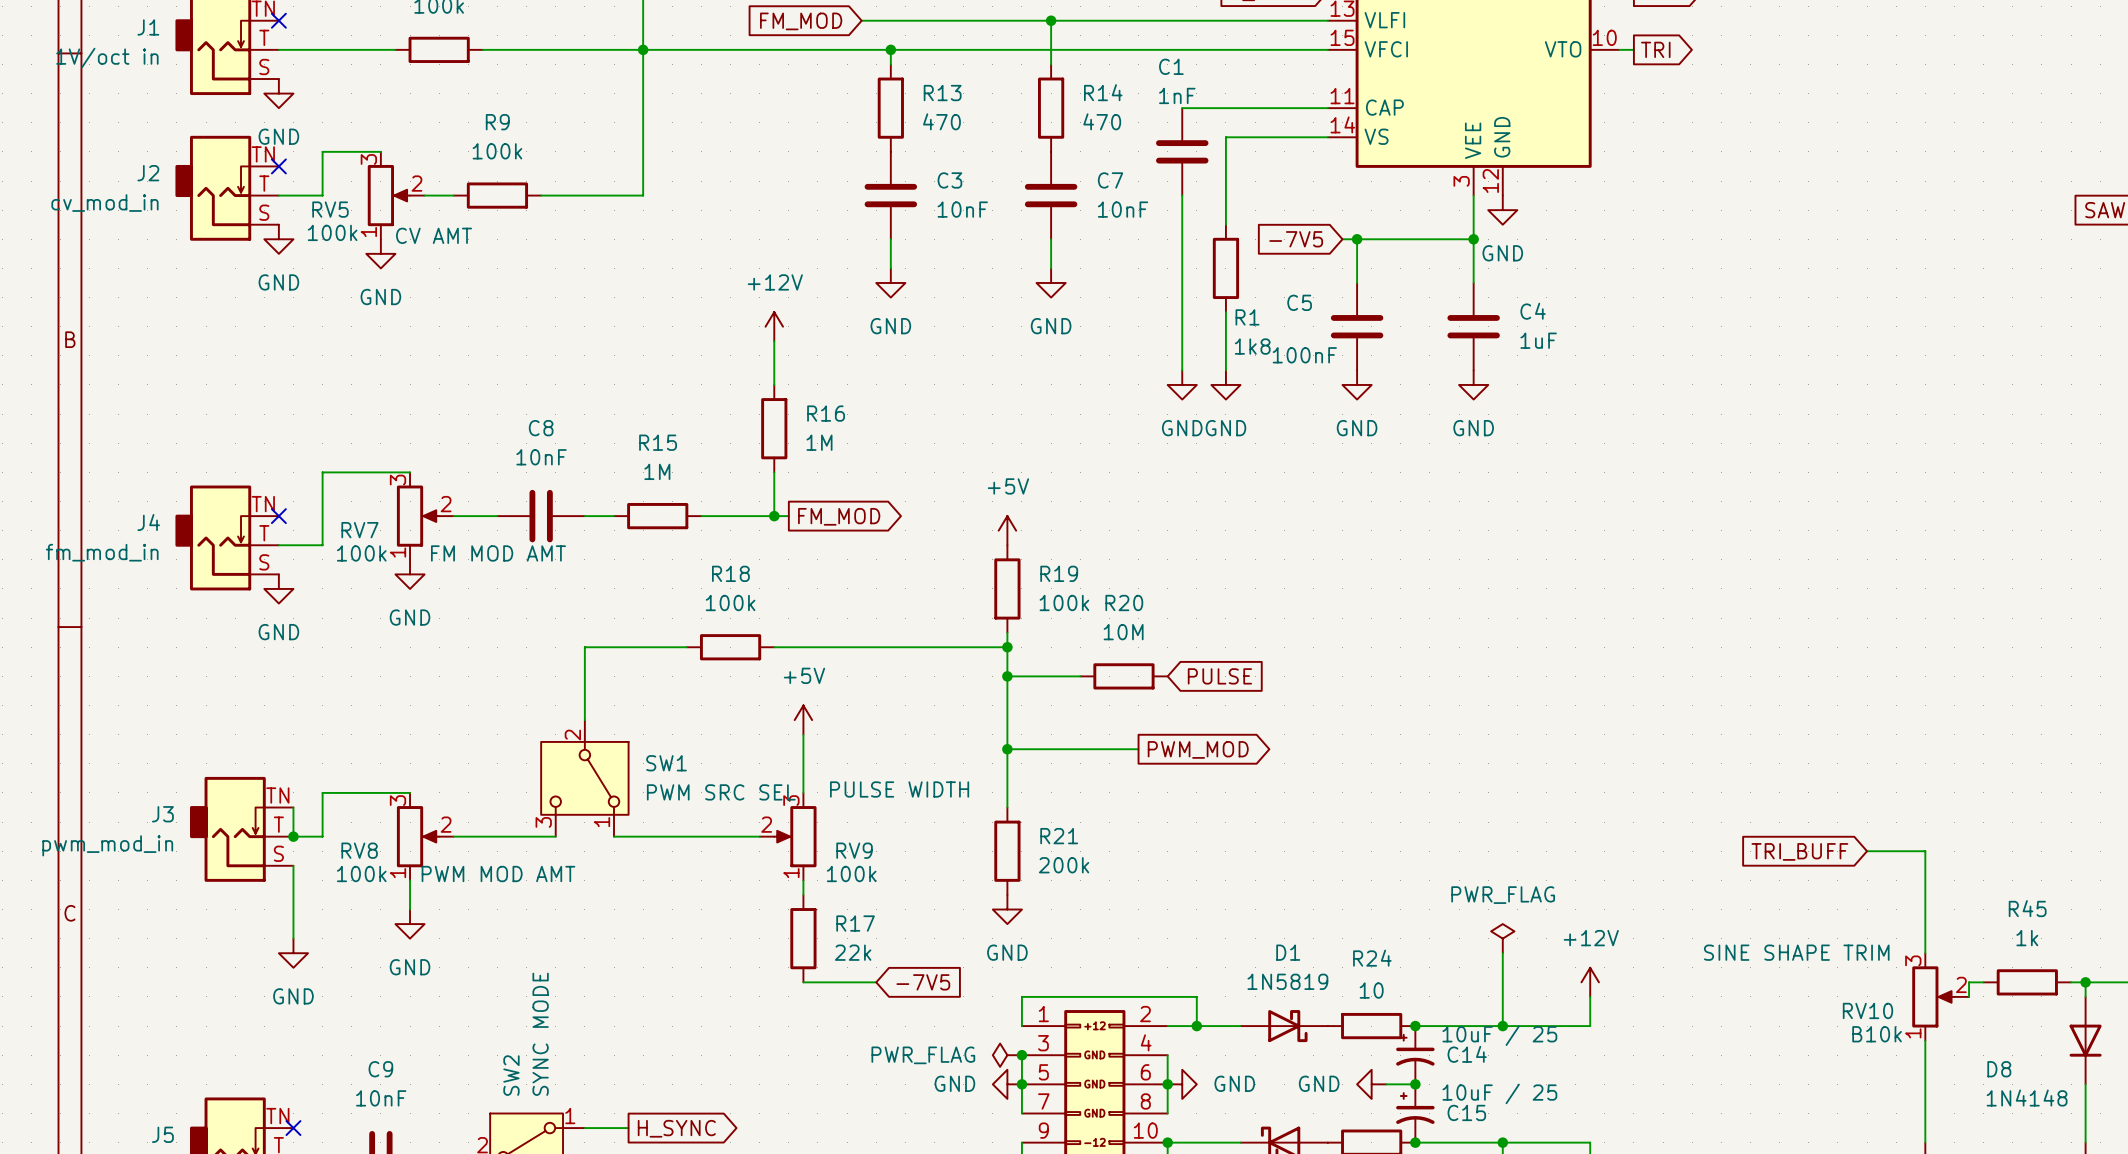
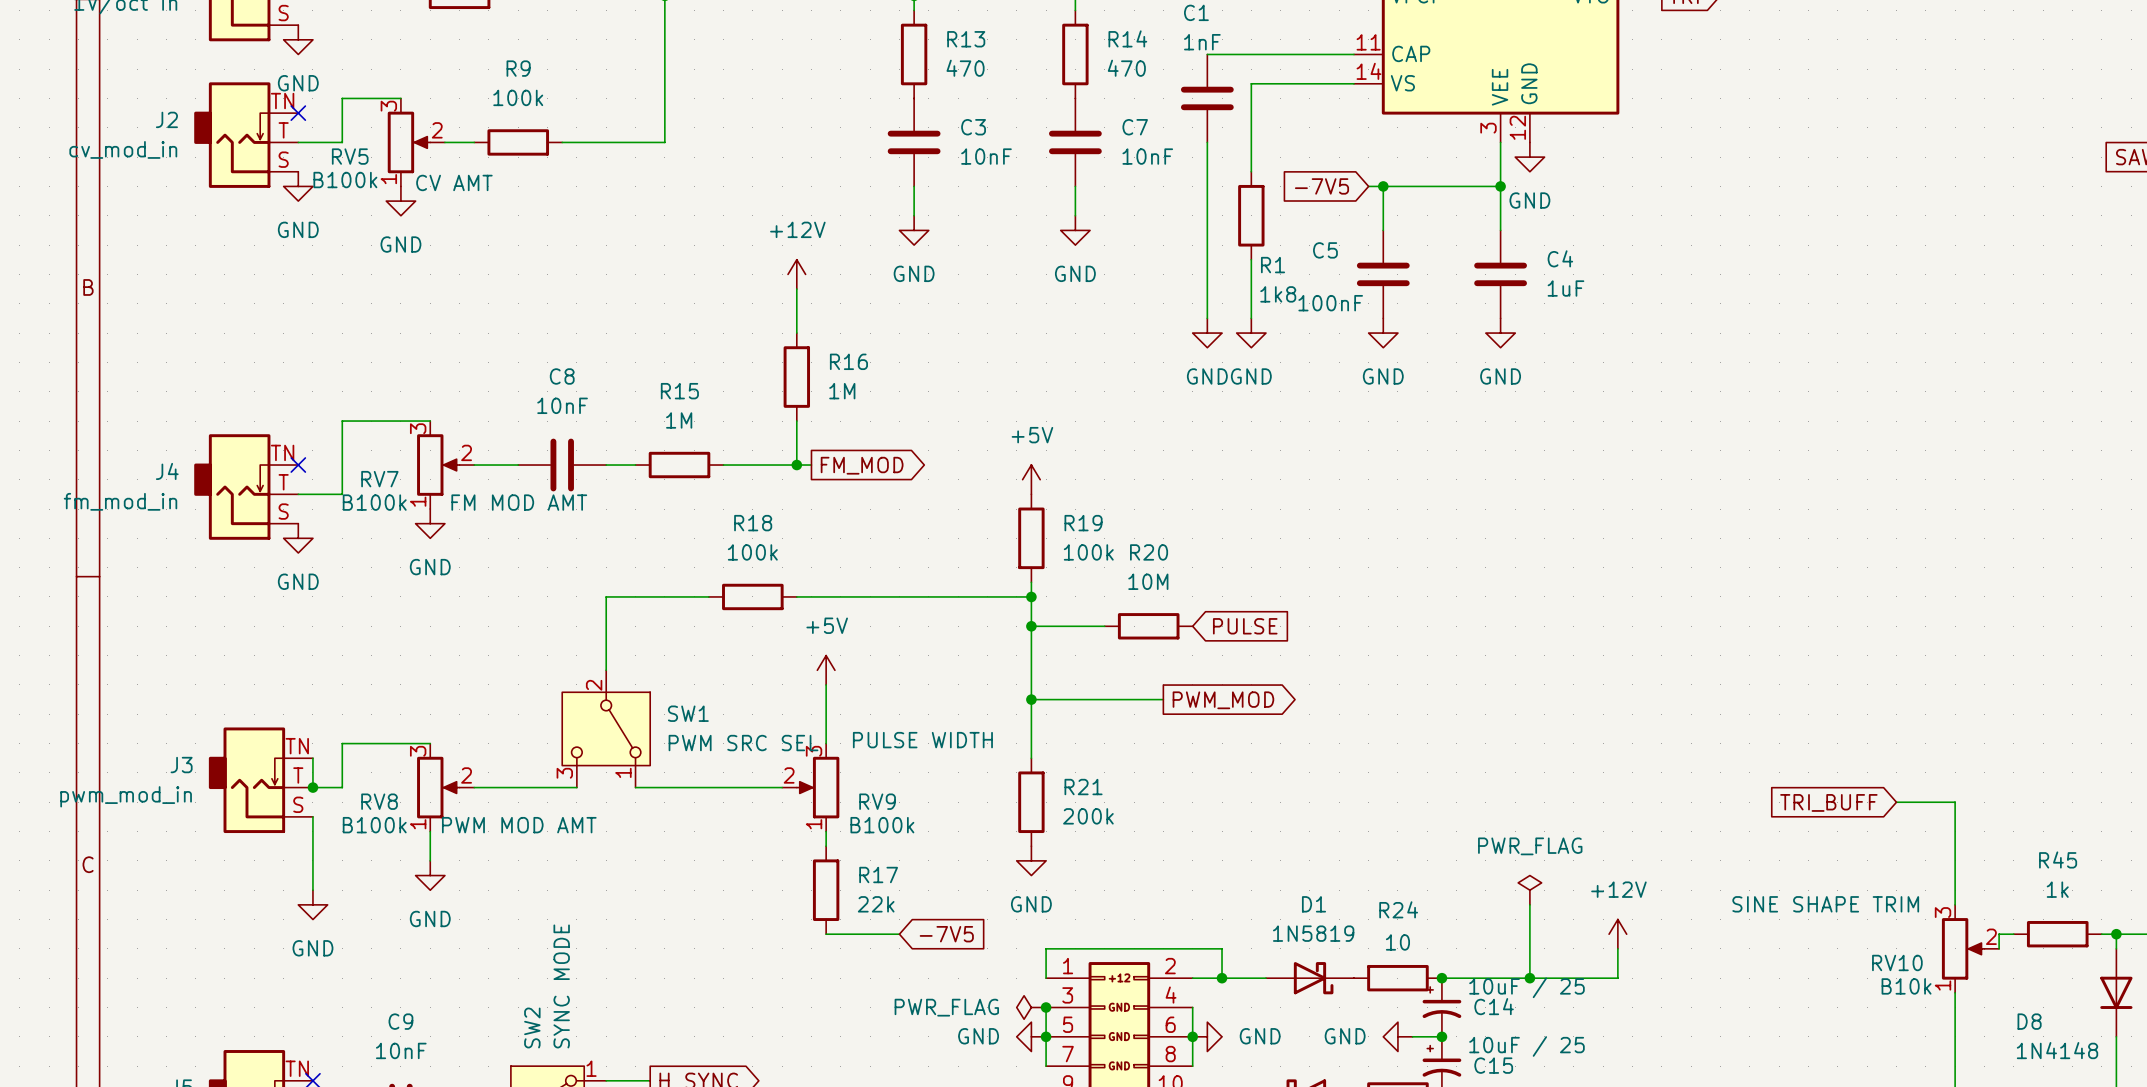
RV5 value: 100k (332, 232) -> B100k (345, 180)
RV7 value: 100k (361, 553) -> B100k (374, 502)
RV8 value: 100k (361, 873) -> B100k (374, 825)
RV9 value: 100k (851, 873) -> B100k (882, 825)

